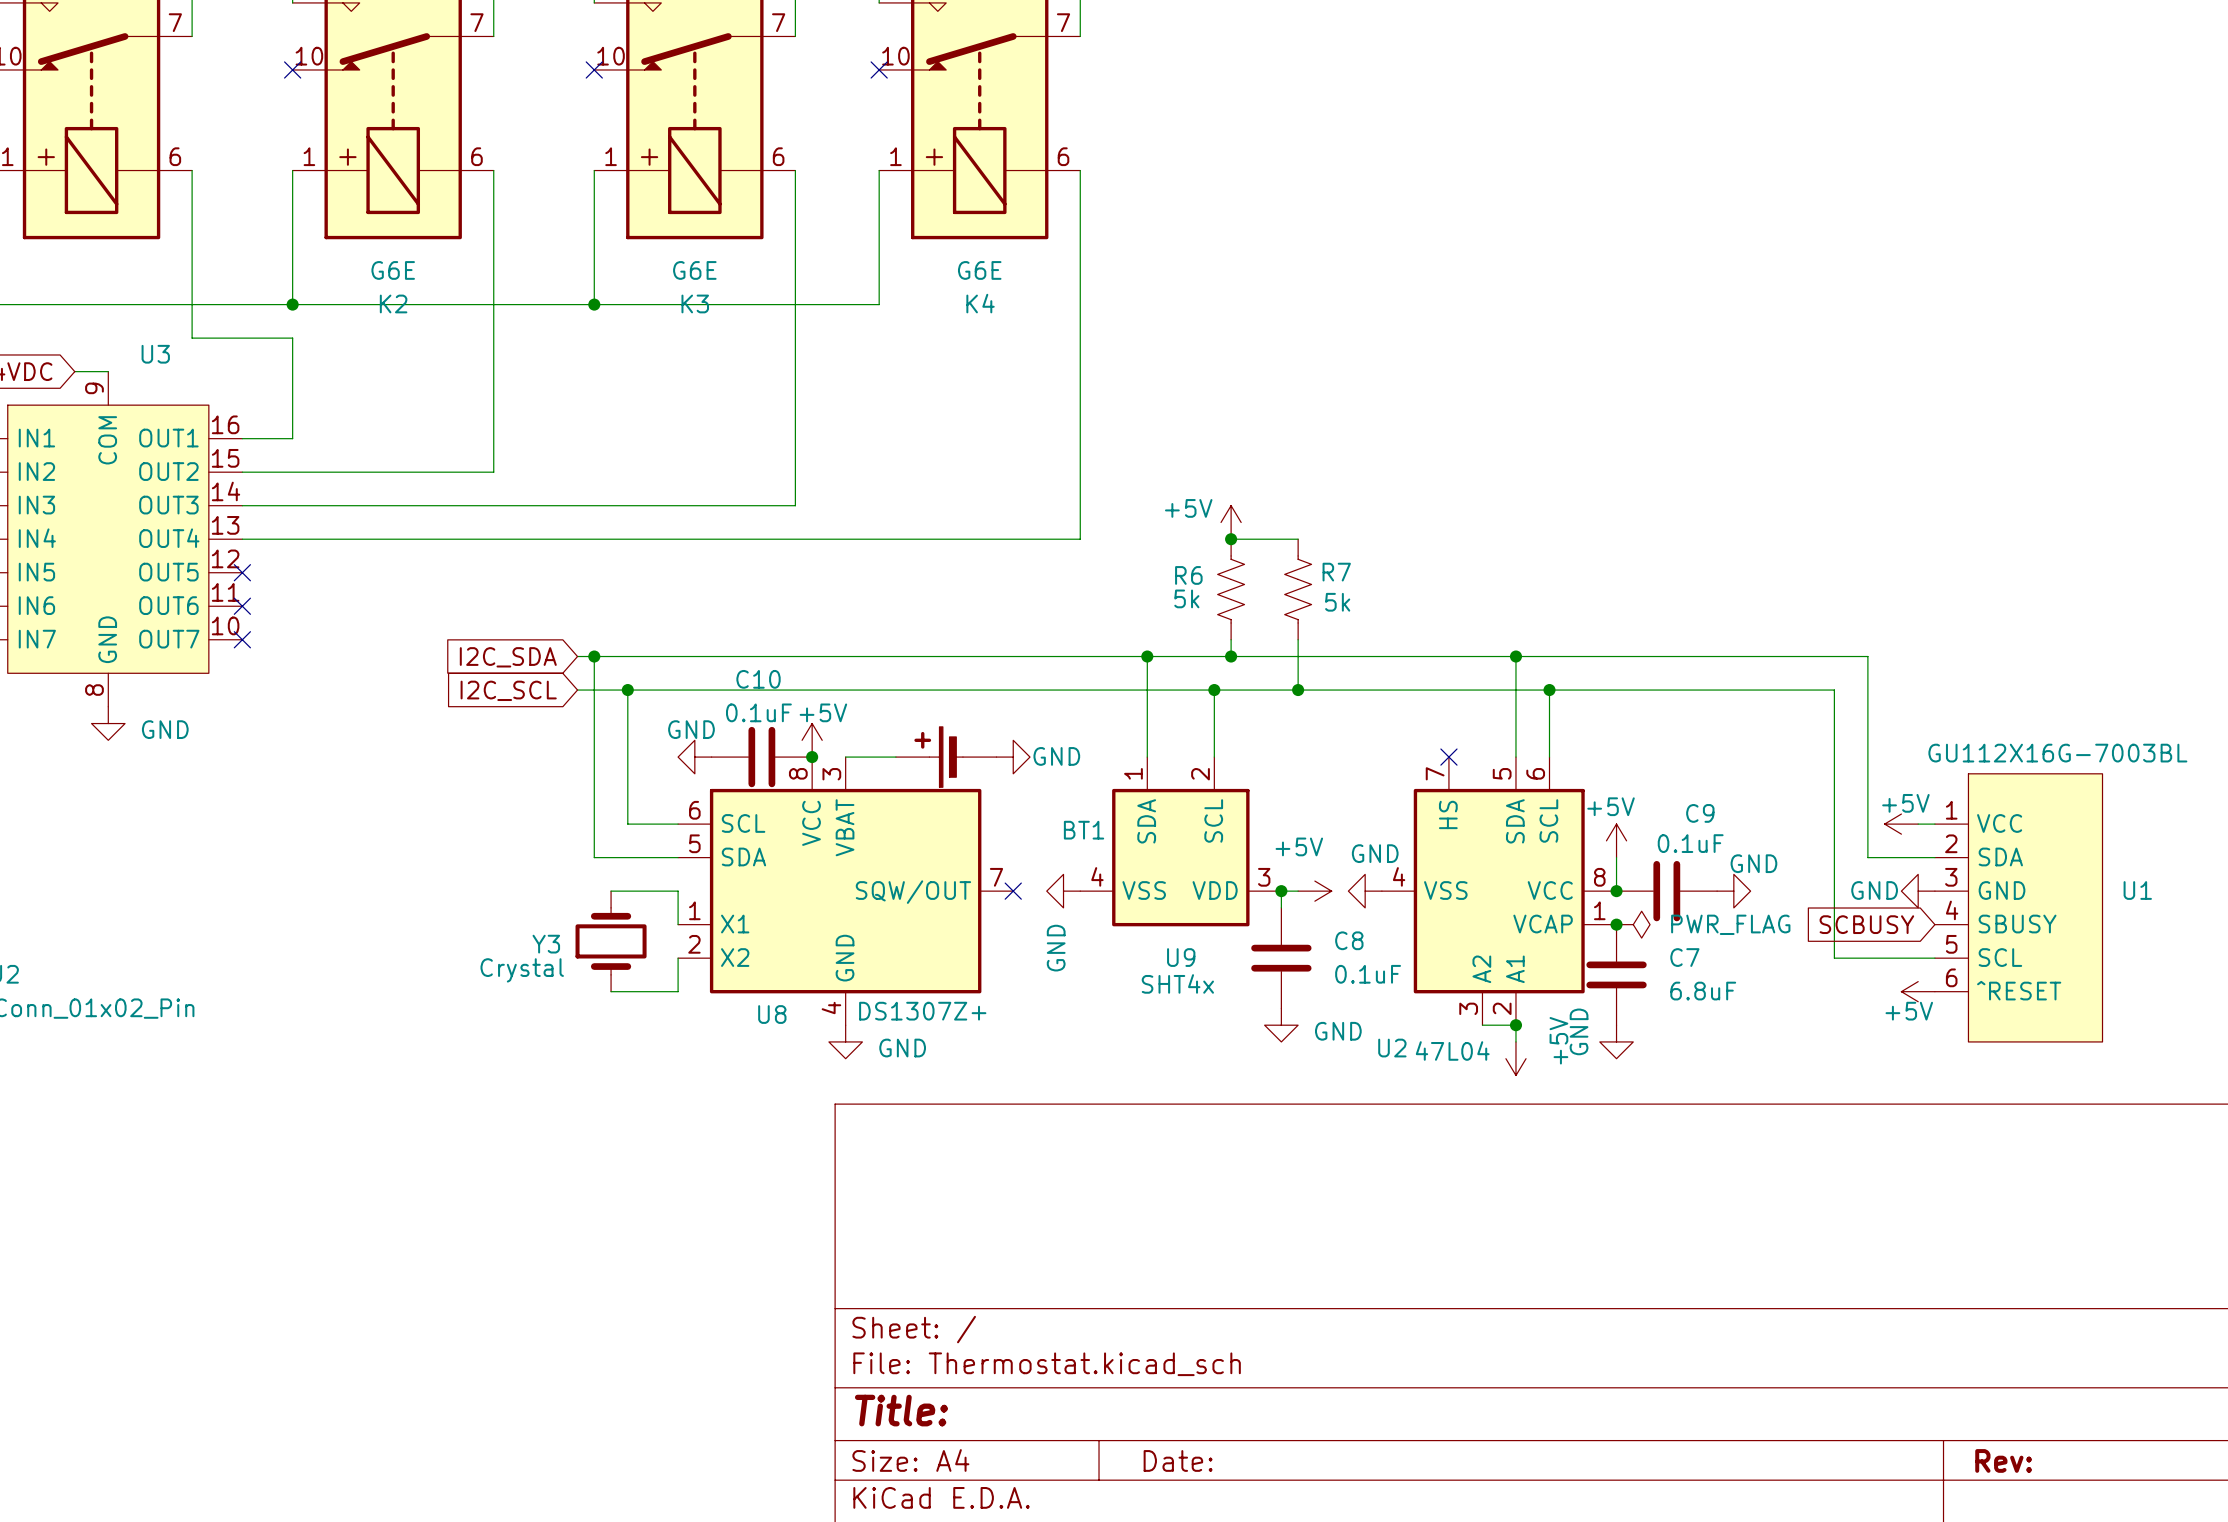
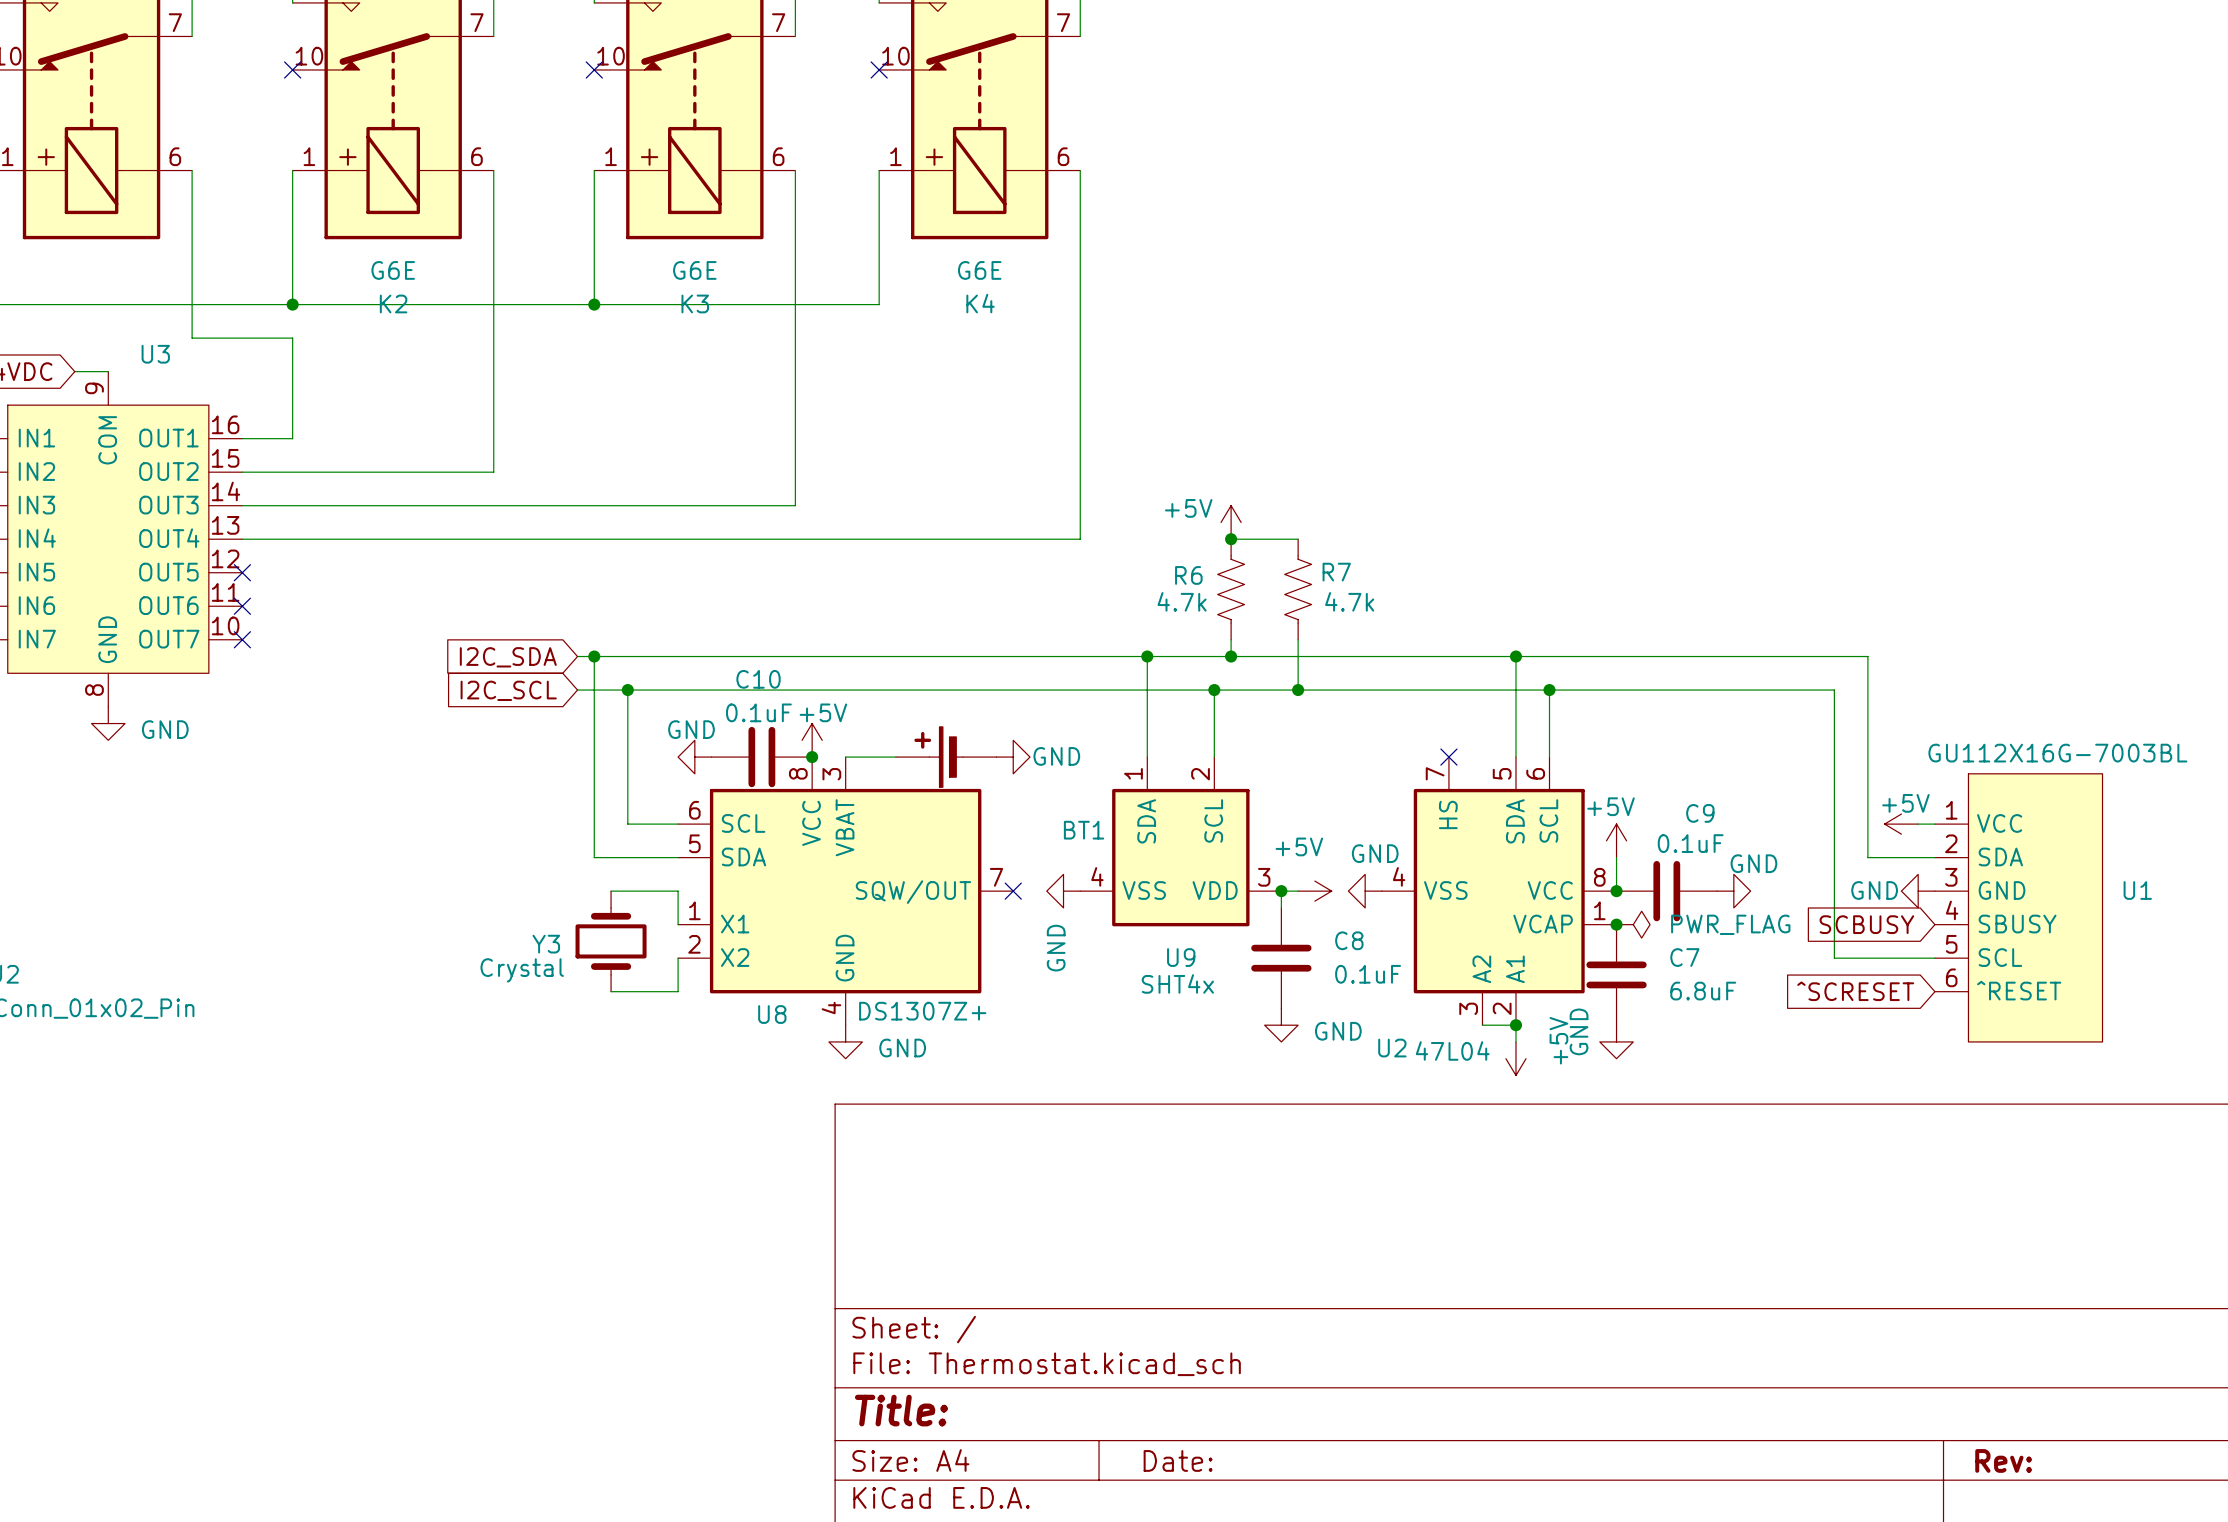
R6 value: 5k (1186, 598) -> 4.7k (1182, 601)
R7 value: 5k (1337, 602) -> 4.7k (1349, 601)
global label: none -> ^SCRESET (1855, 991)
power symbol: +5V (1918, 991) -> none

